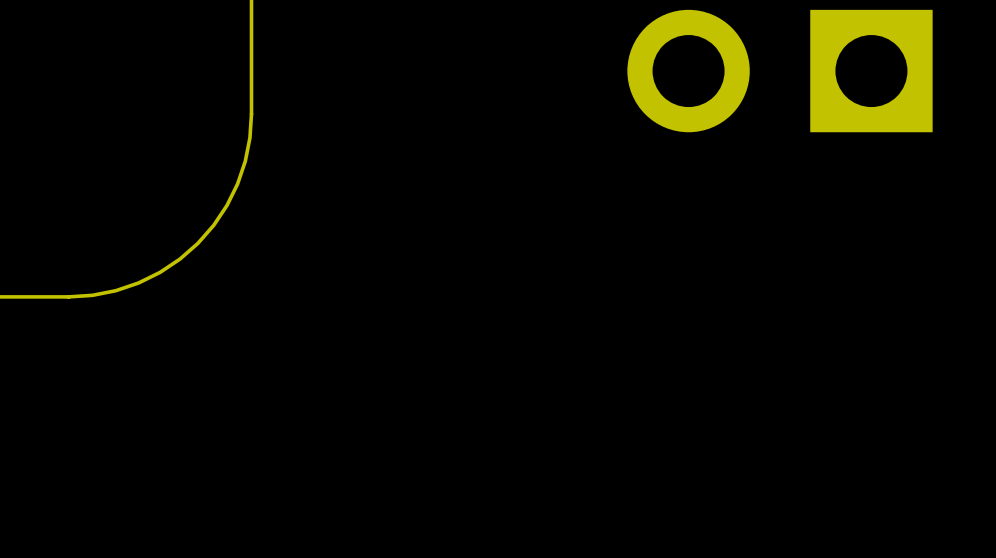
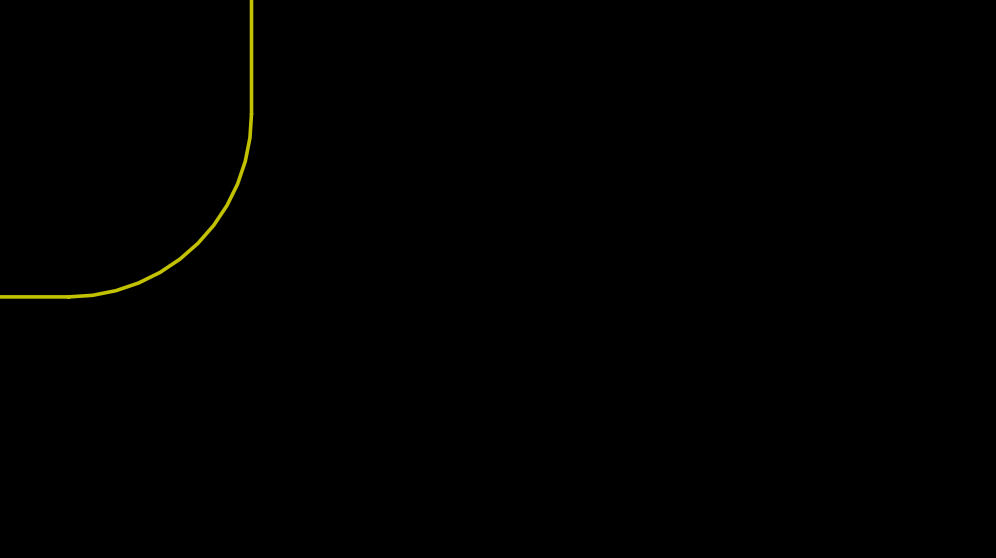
part: (780, 71) -> none

